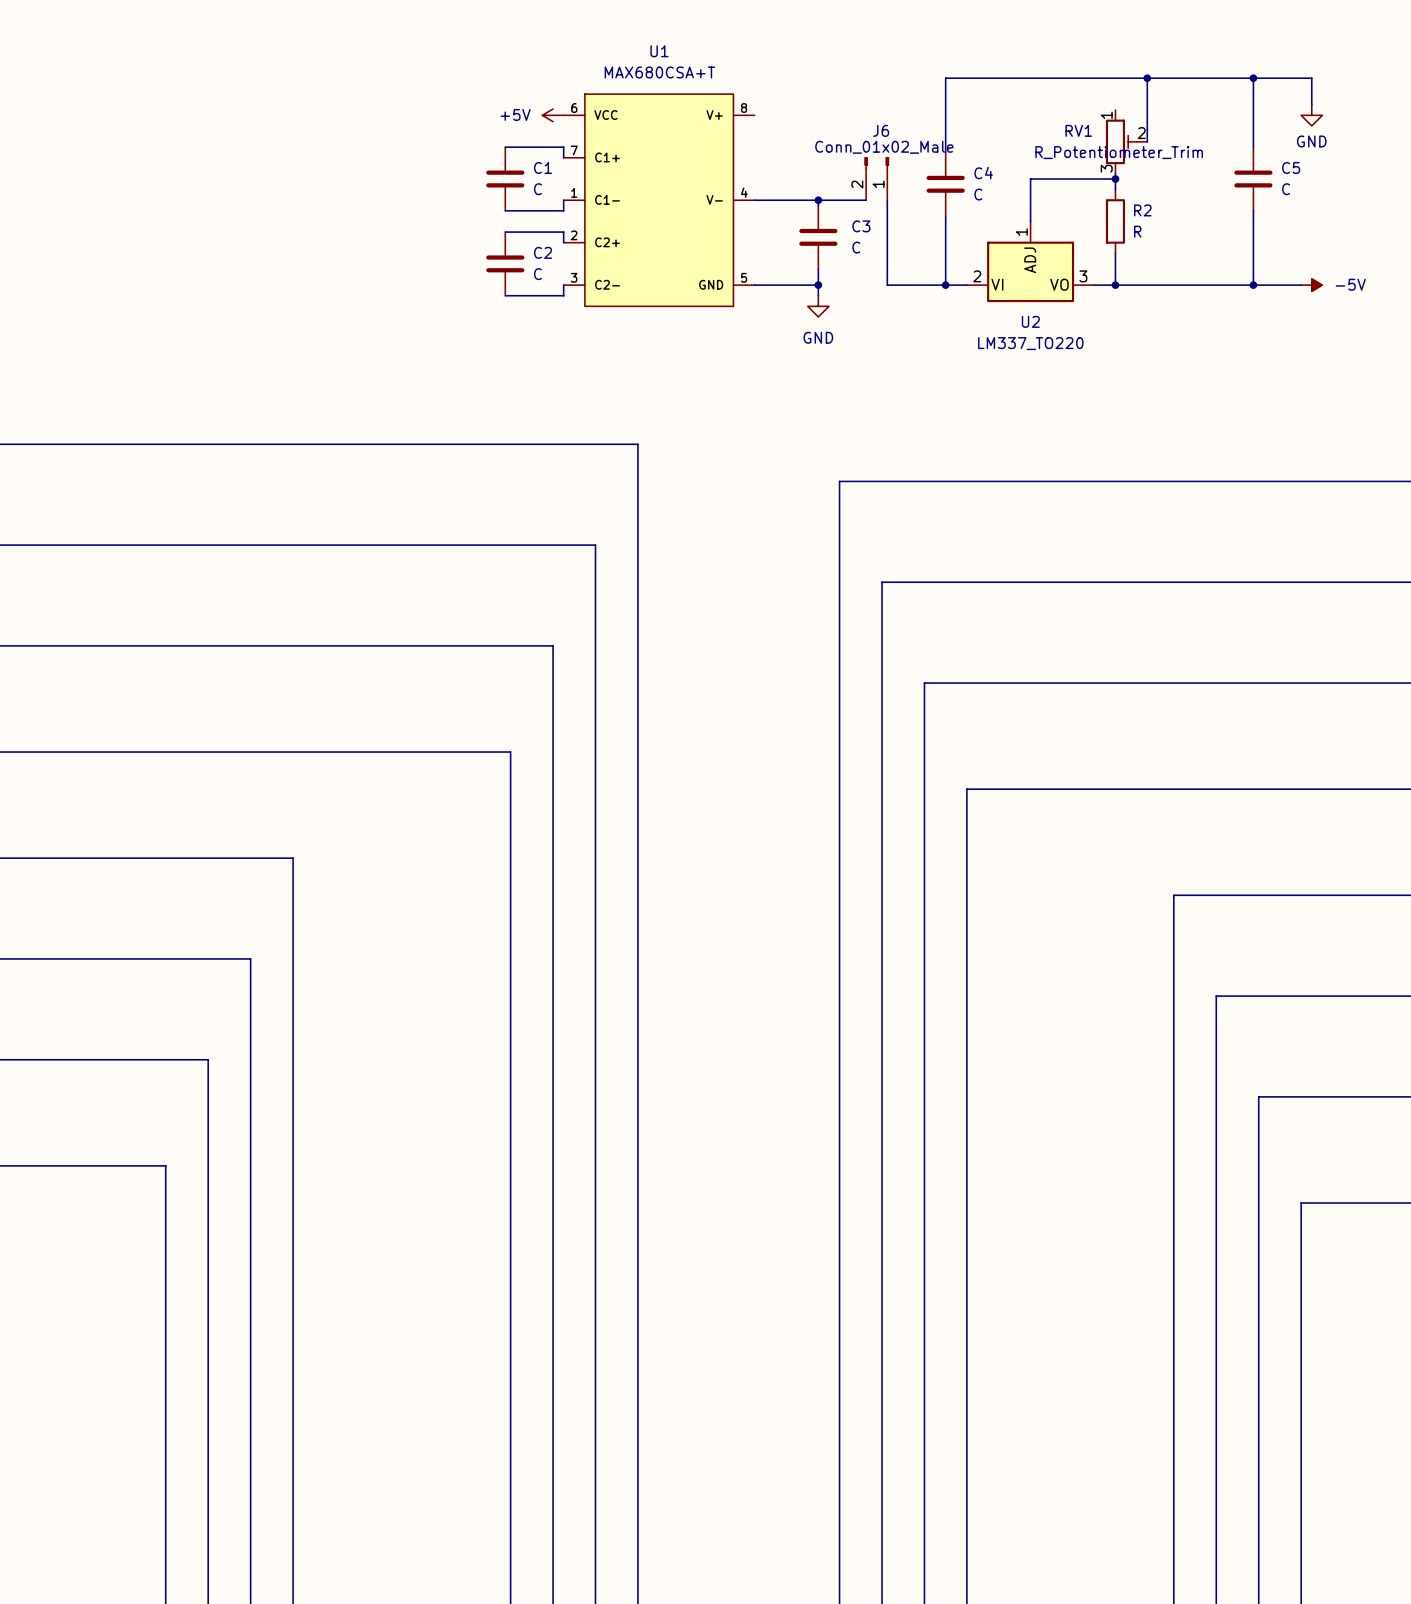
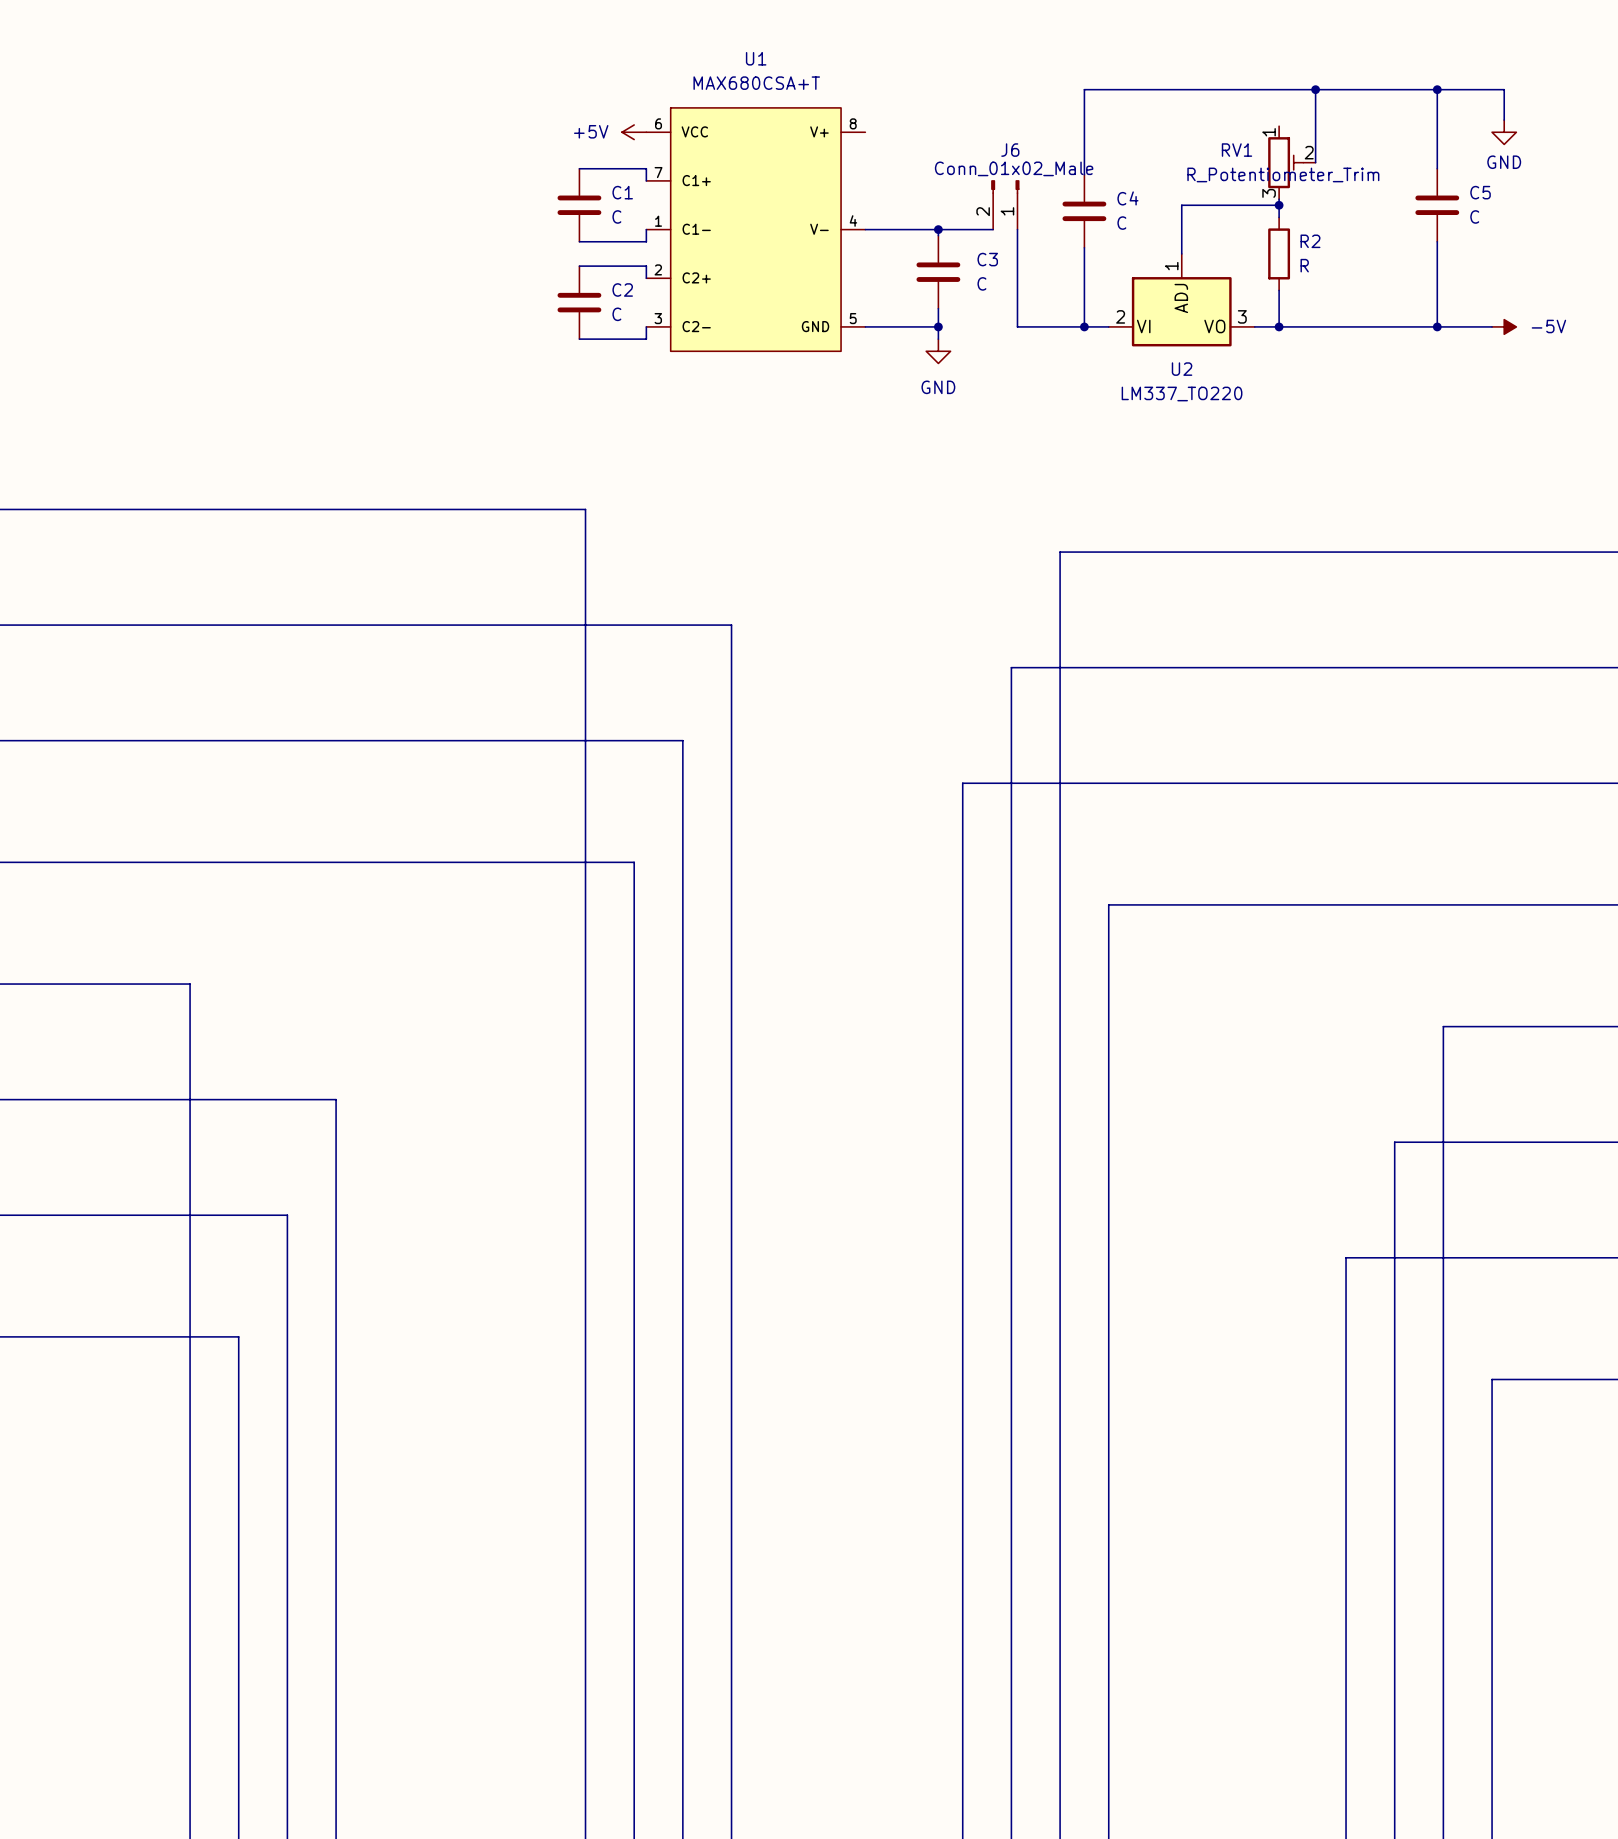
wire: (510, 444) (637, 444) (637, 545) -> (585, 509) (585, 862) (634, 862)
wire: (924, 481) (839, 481) (839, 683) -> (1060, 552) (1060, 783) (962, 783)
wire: (595, 545) (595, 645) -> (682, 625) (731, 625)
wire: (553, 645) (553, 752) -> (634, 740) (682, 740)
wire: (165, 858) (293, 858) (293, 958) -> (190, 984) (190, 1336) (238, 1336)
wire: (1258, 895) (1173, 895) (1173, 1096) -> (1443, 1026) (1443, 1257) (1346, 1257)
wire: (250, 958) (250, 1059) -> (287, 1099) (336, 1099)
wire: (208, 1059) (208, 1165) -> (238, 1215) (287, 1215)

